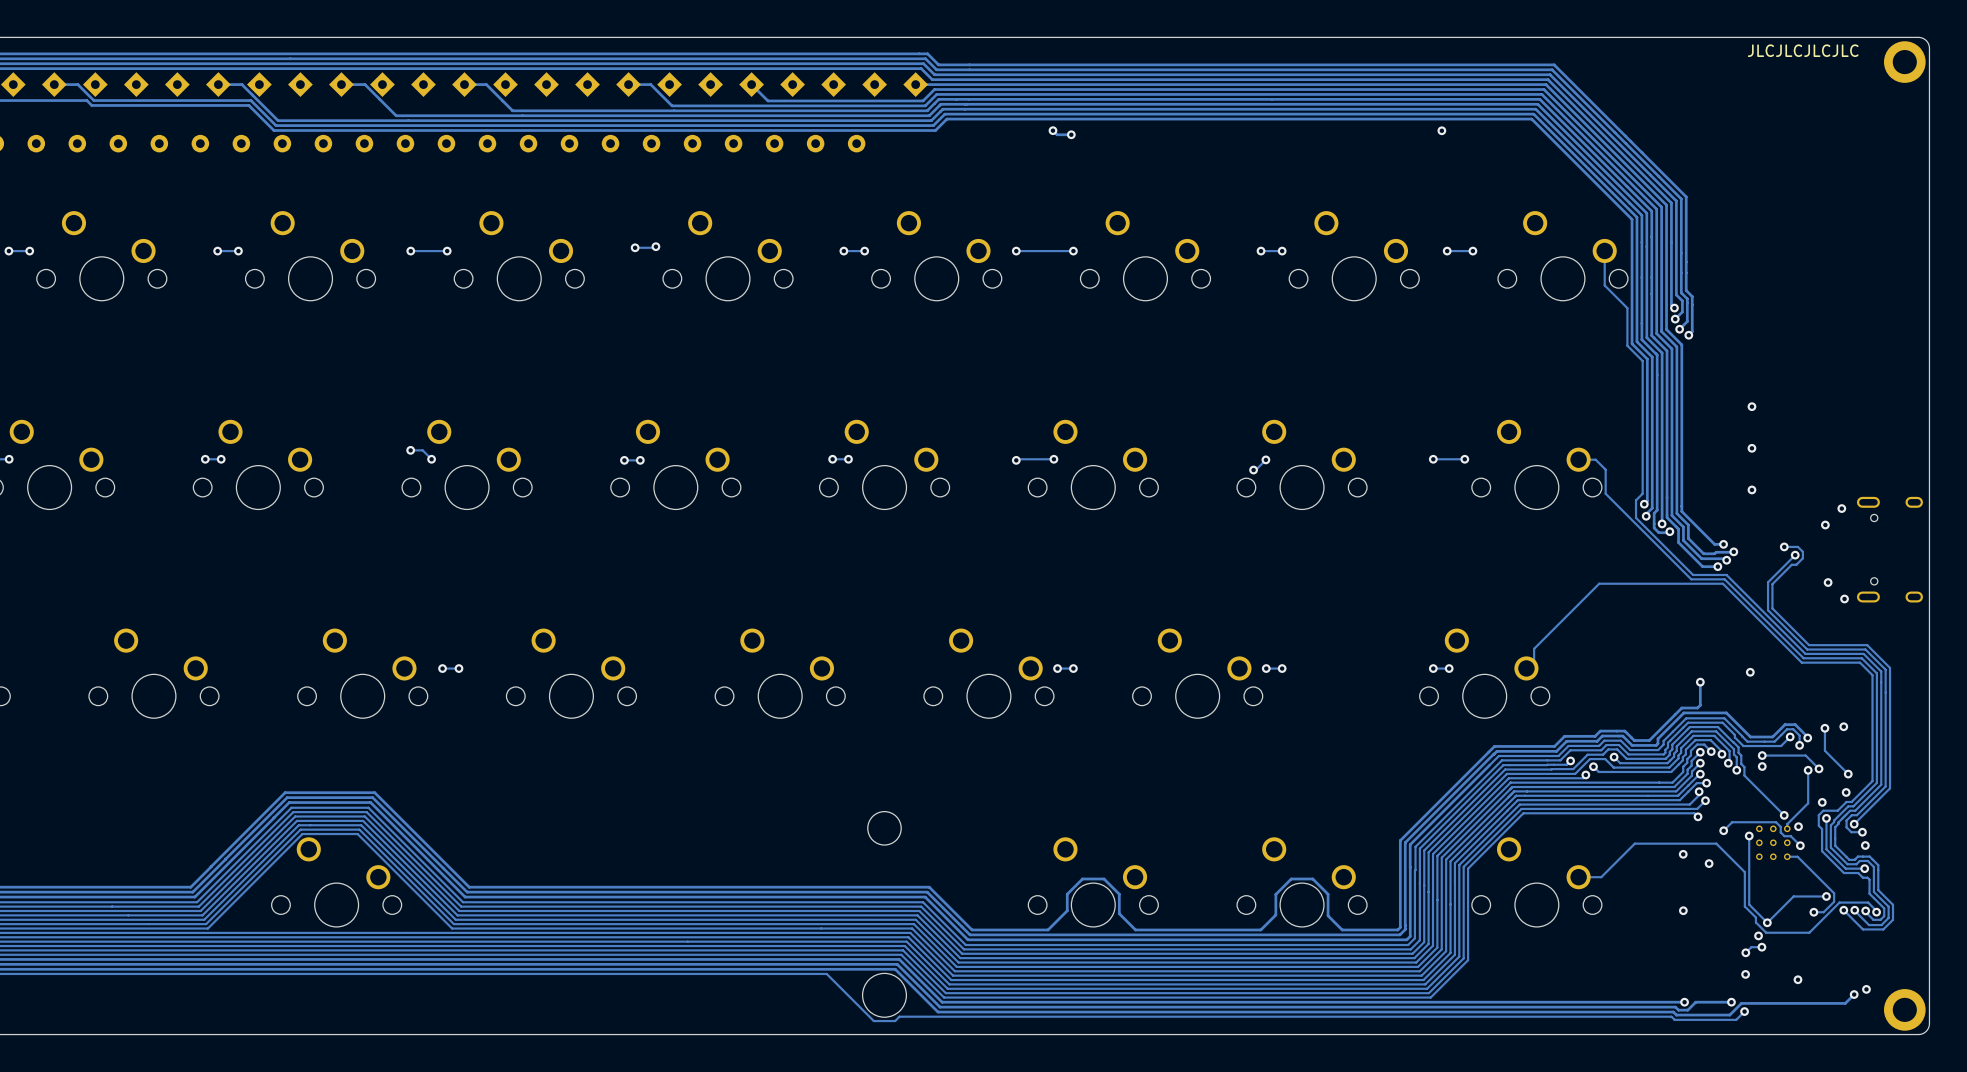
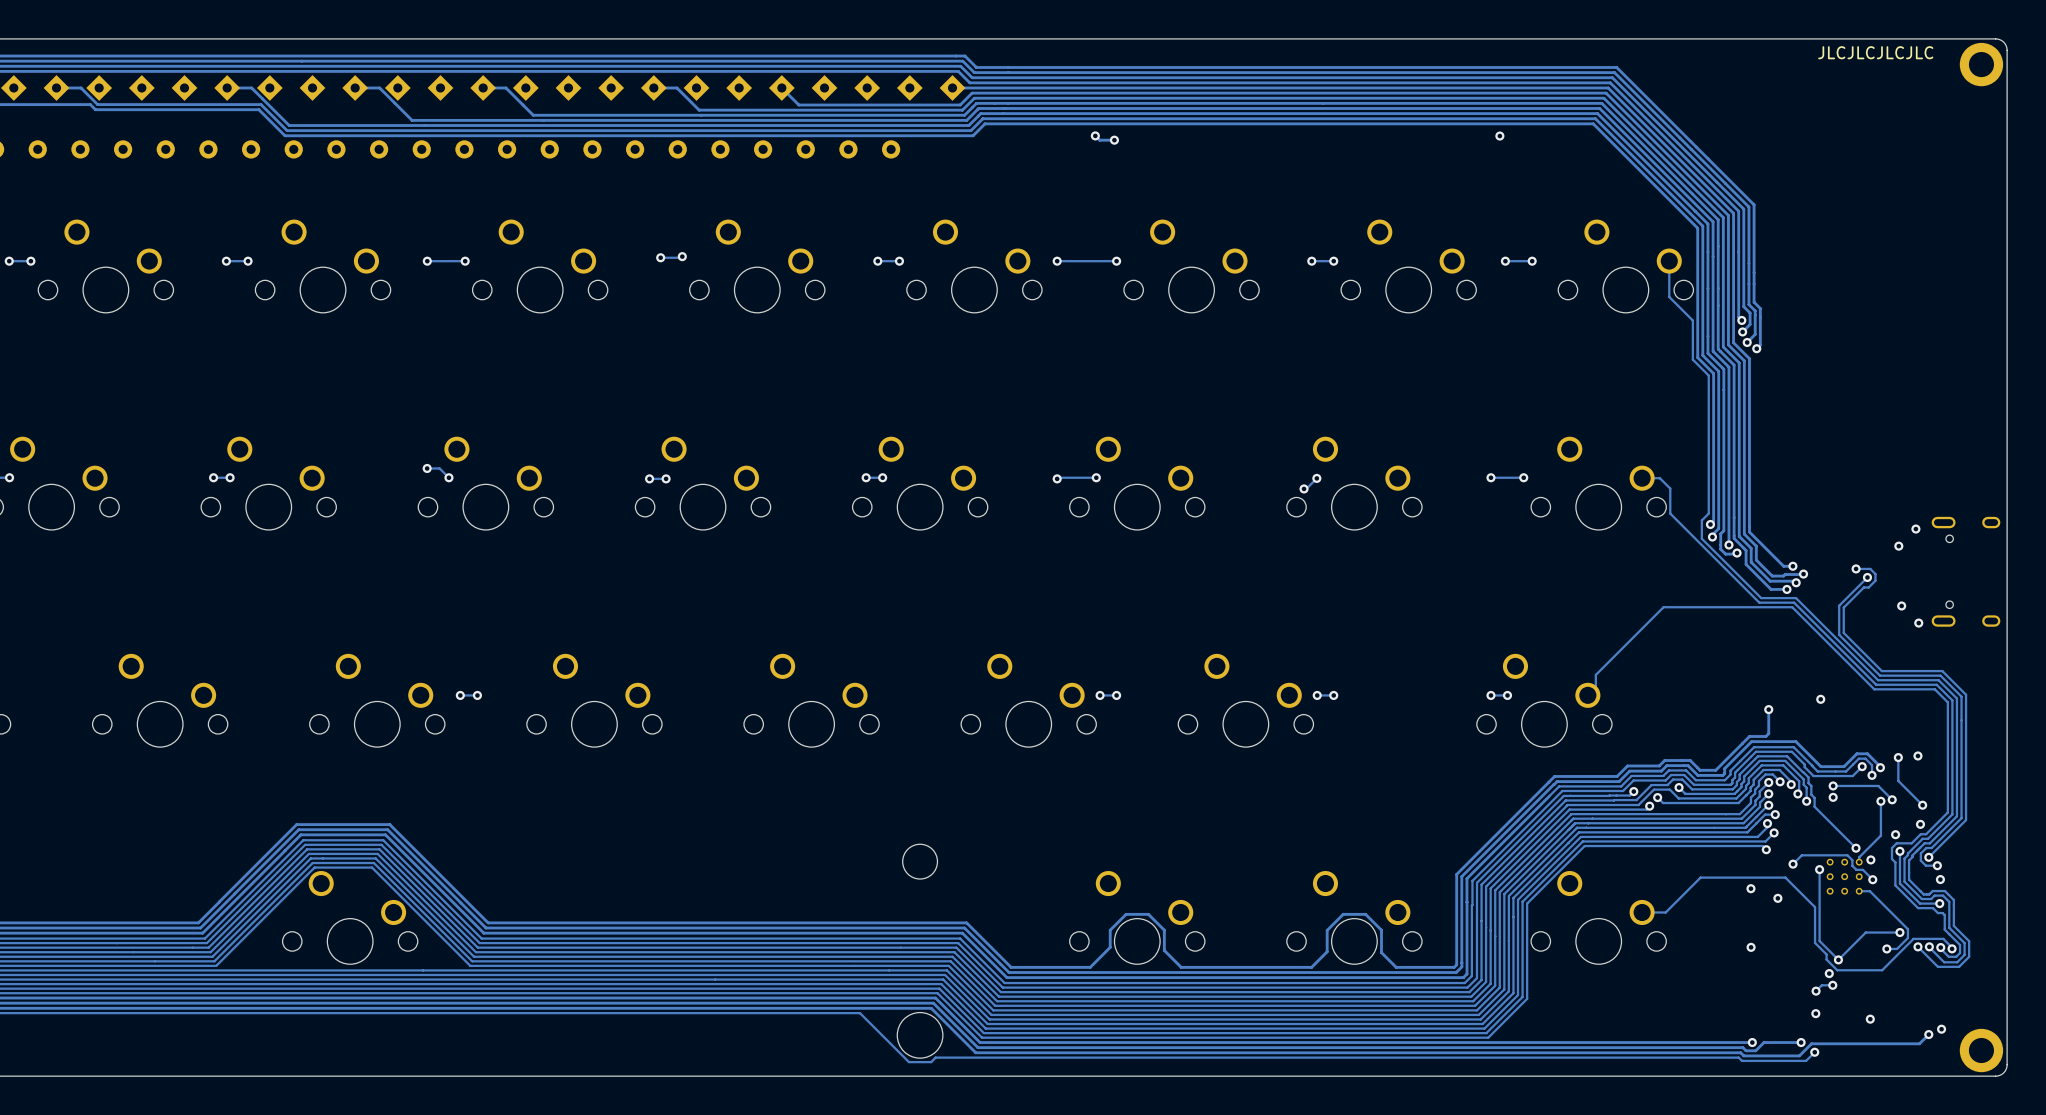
via: (1751, 406) -> none
via: (1751, 448) -> none
via: (1751, 489) -> none

